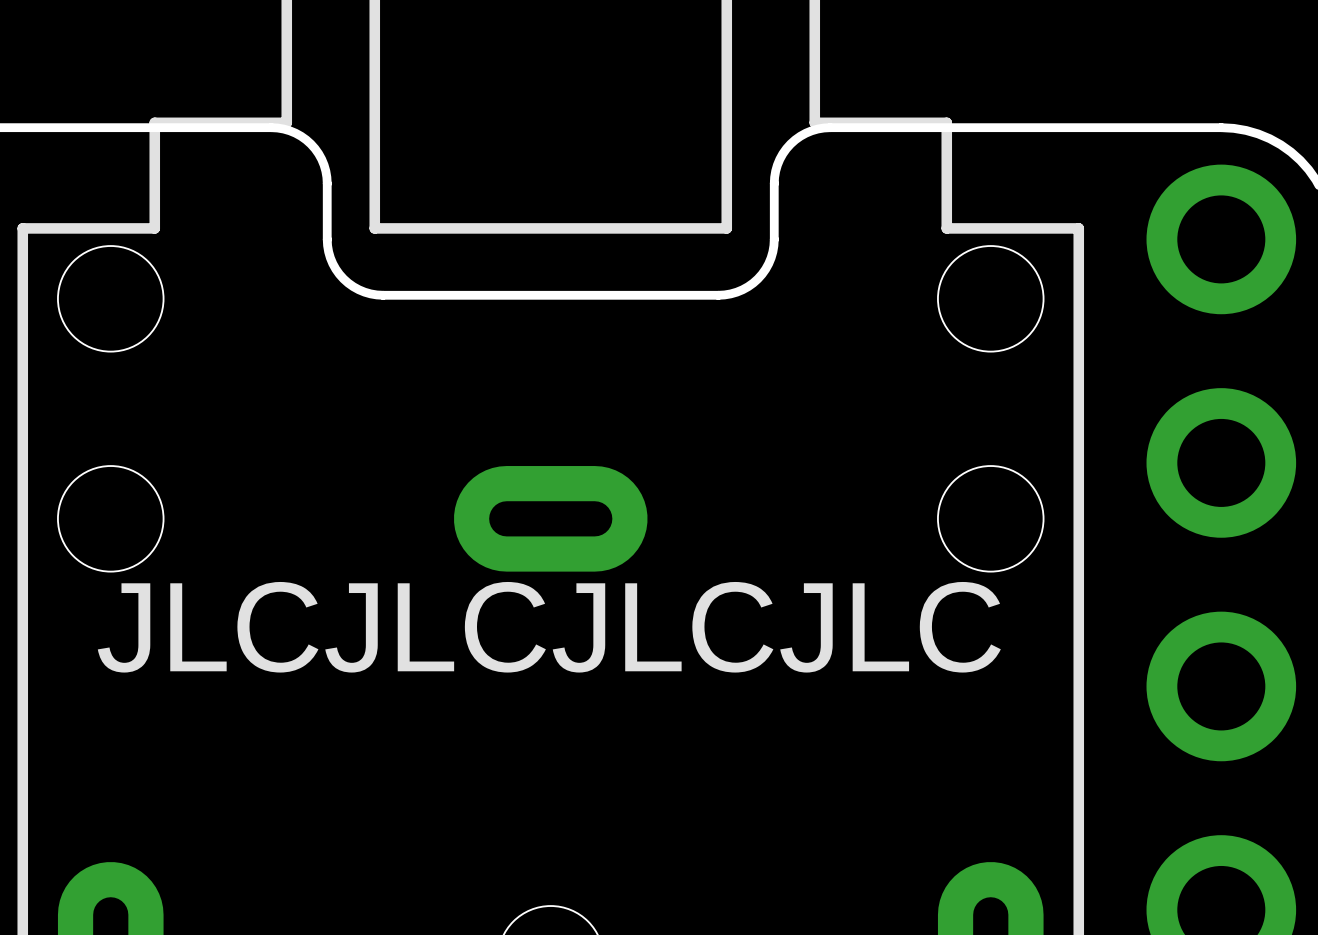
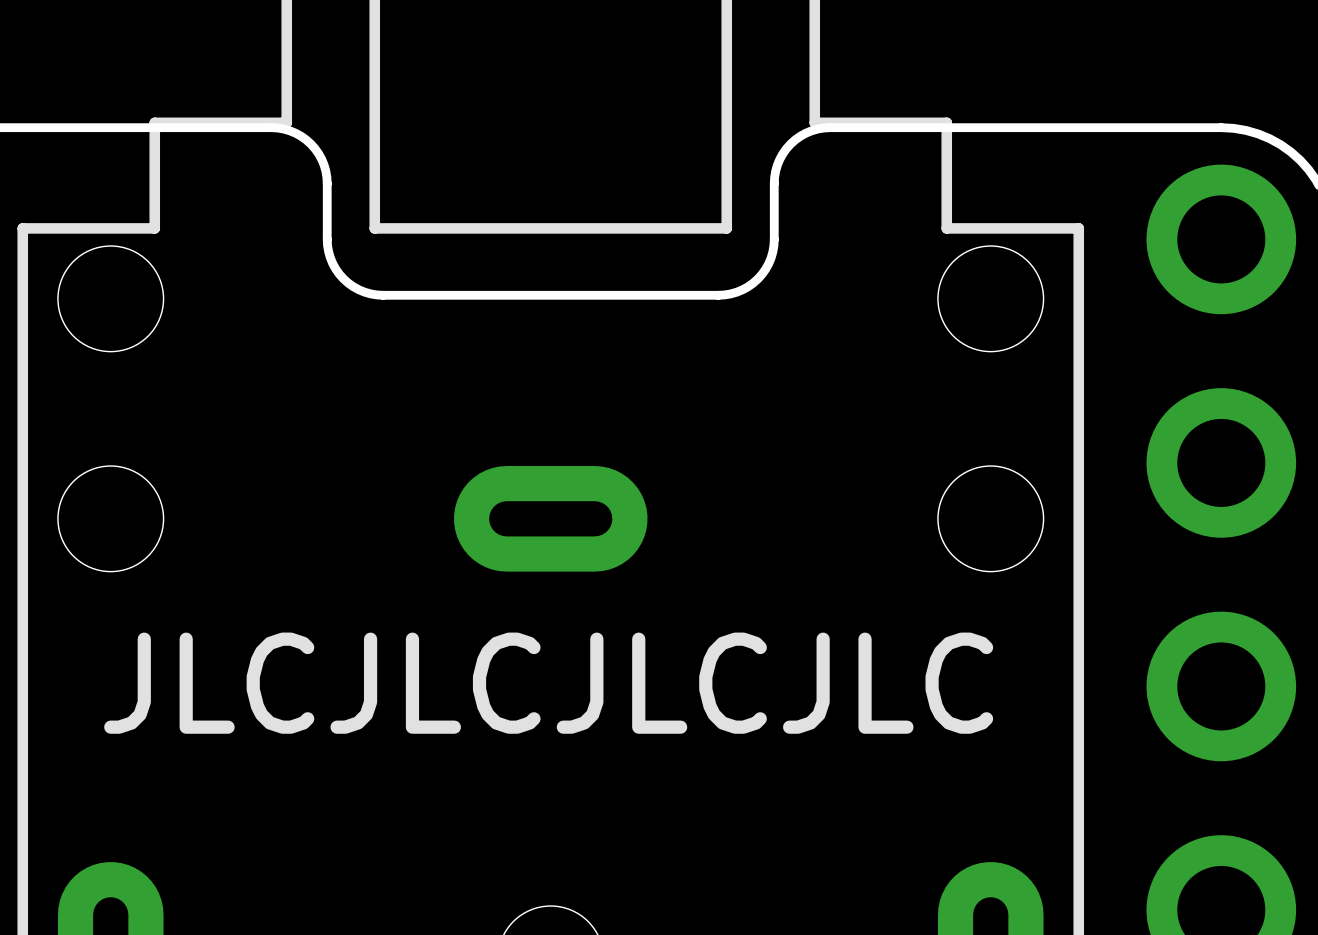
text position: JLCJLCJLCJLC (549, 627) -> JLCJLCJLCJLC (548, 683)

